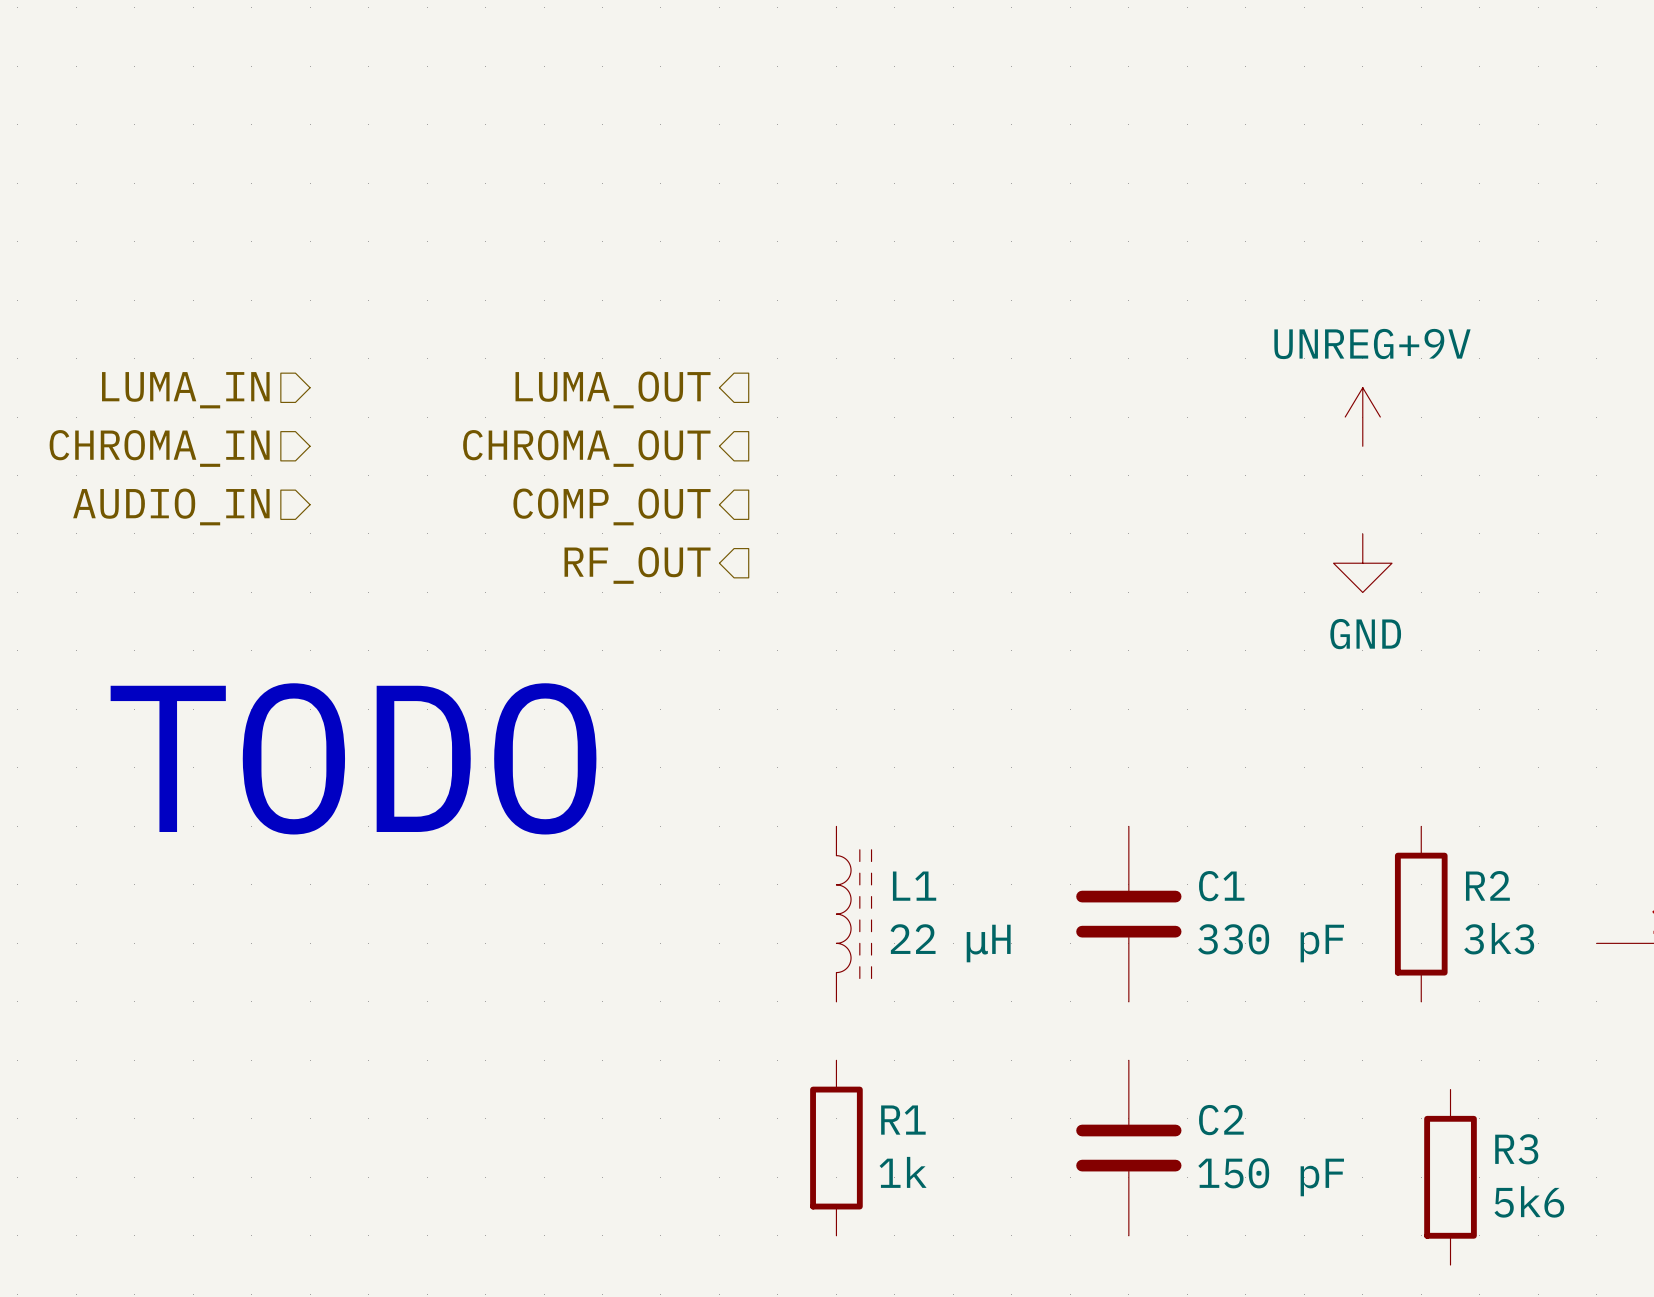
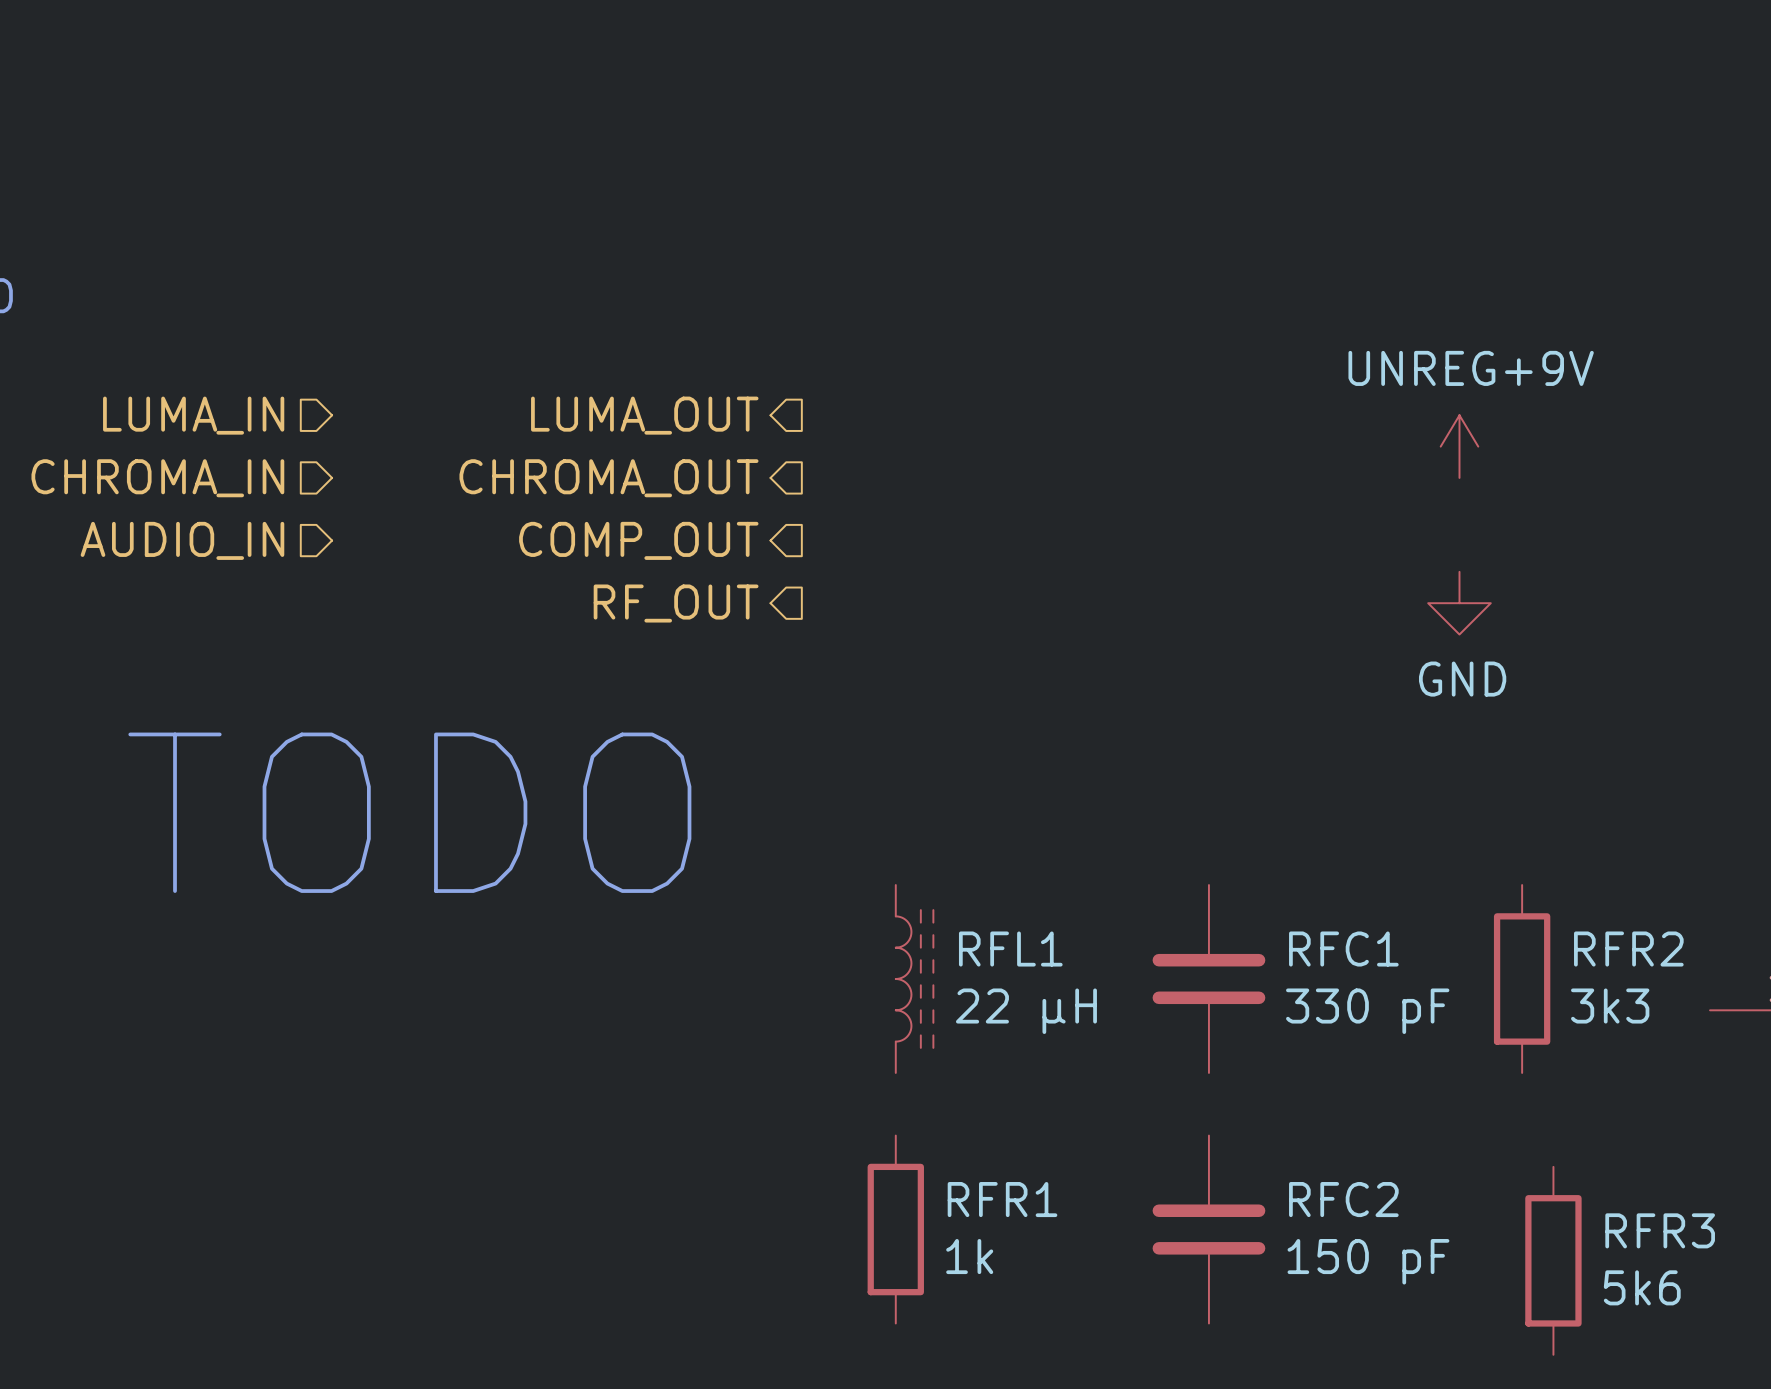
R2 name: R2 (1487, 885) -> RFR2 (1628, 949)
L1 name: L1 (914, 886) -> RFL1 (1010, 949)
C1 name: C1 (1221, 886) -> RFC1 (1343, 949)
R1 name: R1 (903, 1120) -> RFR1 (1002, 1199)
C2 name: C2 (1221, 1120) -> RFC2 (1343, 1199)
R3 name: R3 (1516, 1149) -> RFR3 (1660, 1230)

